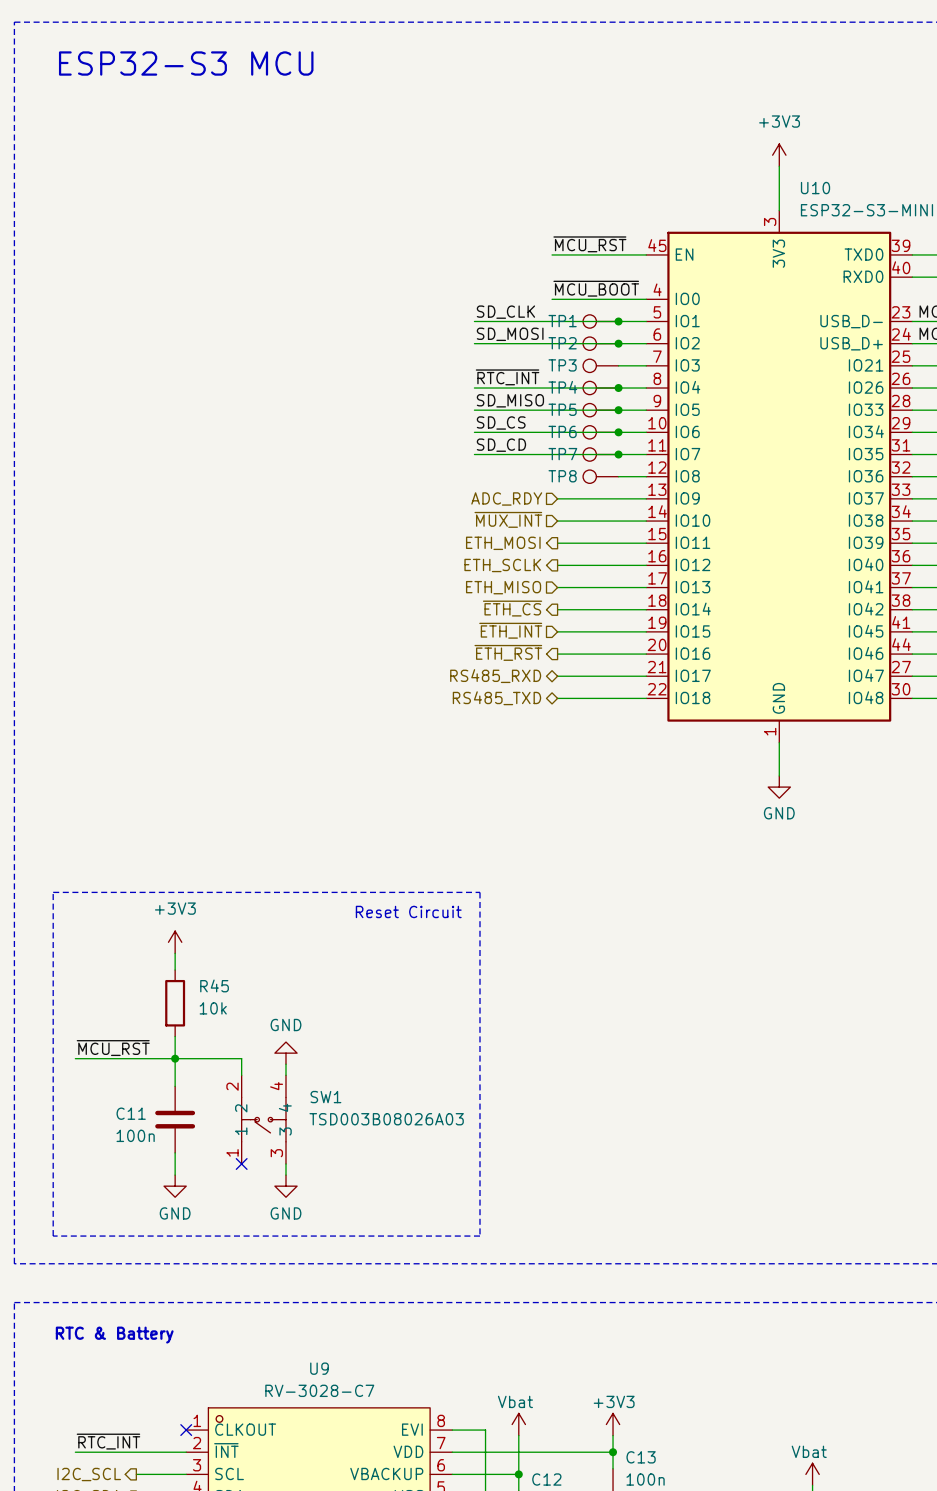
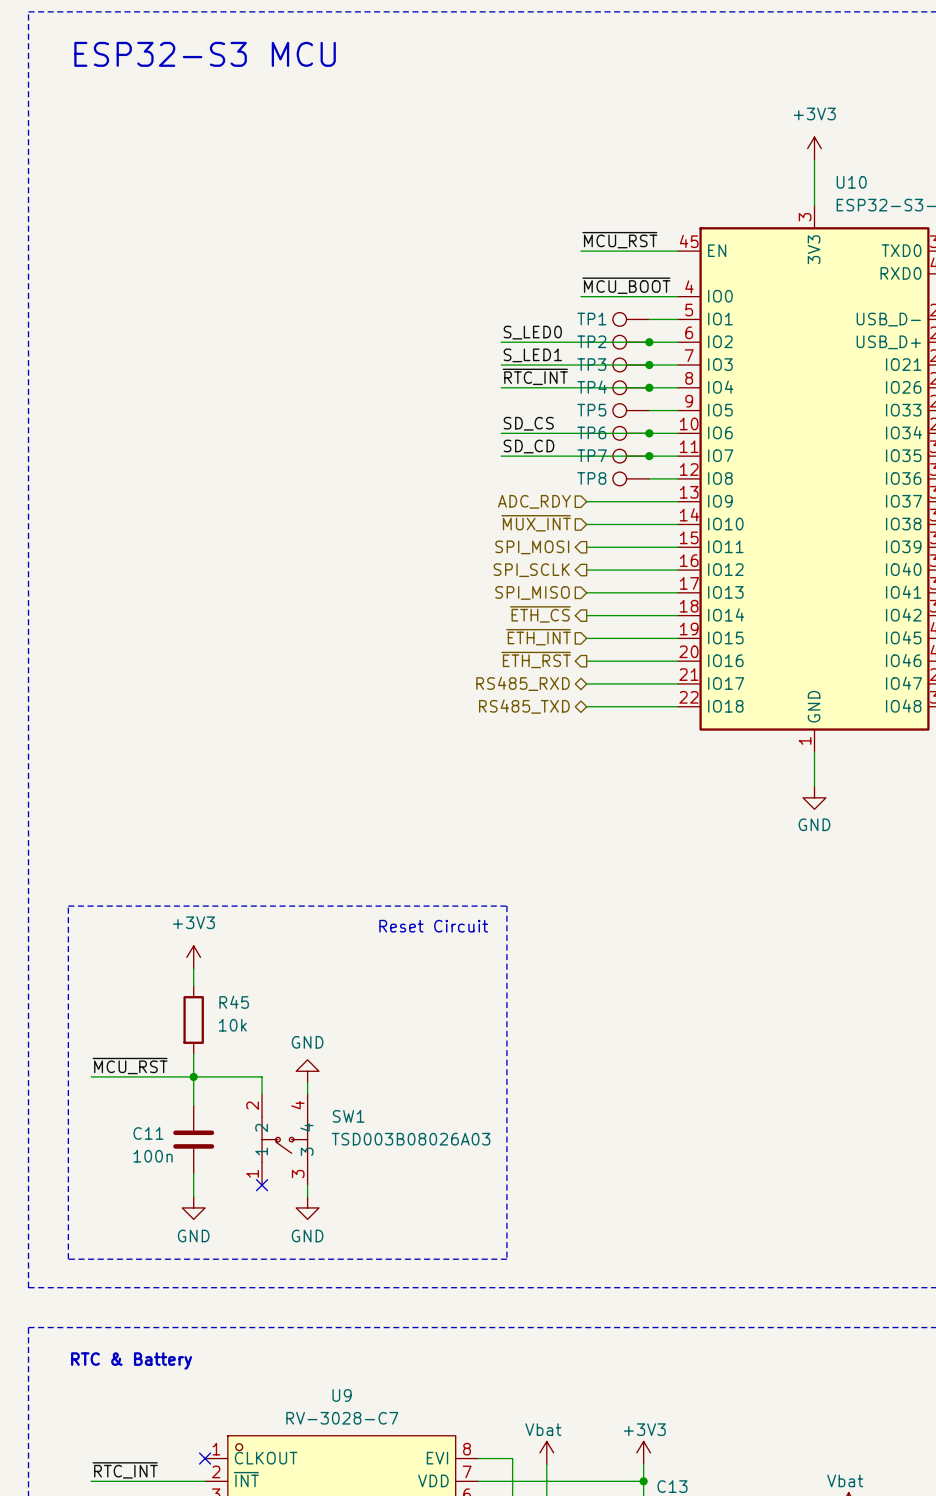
label: SD_CLK (505, 312) -> none
wire: (474, 321) (618, 321) -> (501, 365) (649, 365)
junction: (618, 321) -> none
label: SD_MOSI (510, 334) -> S_LED0 (532, 332)
label: none -> S_LED1 (532, 355)
junction: none -> (649, 365)
label: SD_MISO (510, 400) -> none
wire: (474, 410) (618, 410) -> none
junction: (618, 410) -> none
hierarchical label: ETH_MOSI (503, 543) -> SPI_MOSI (532, 547)
hierarchical label: ETH_SCLK (502, 565) -> SPI_SCLK (531, 570)
hierarchical label: ETH_MISO (503, 587) -> SPI_MISO (532, 592)

